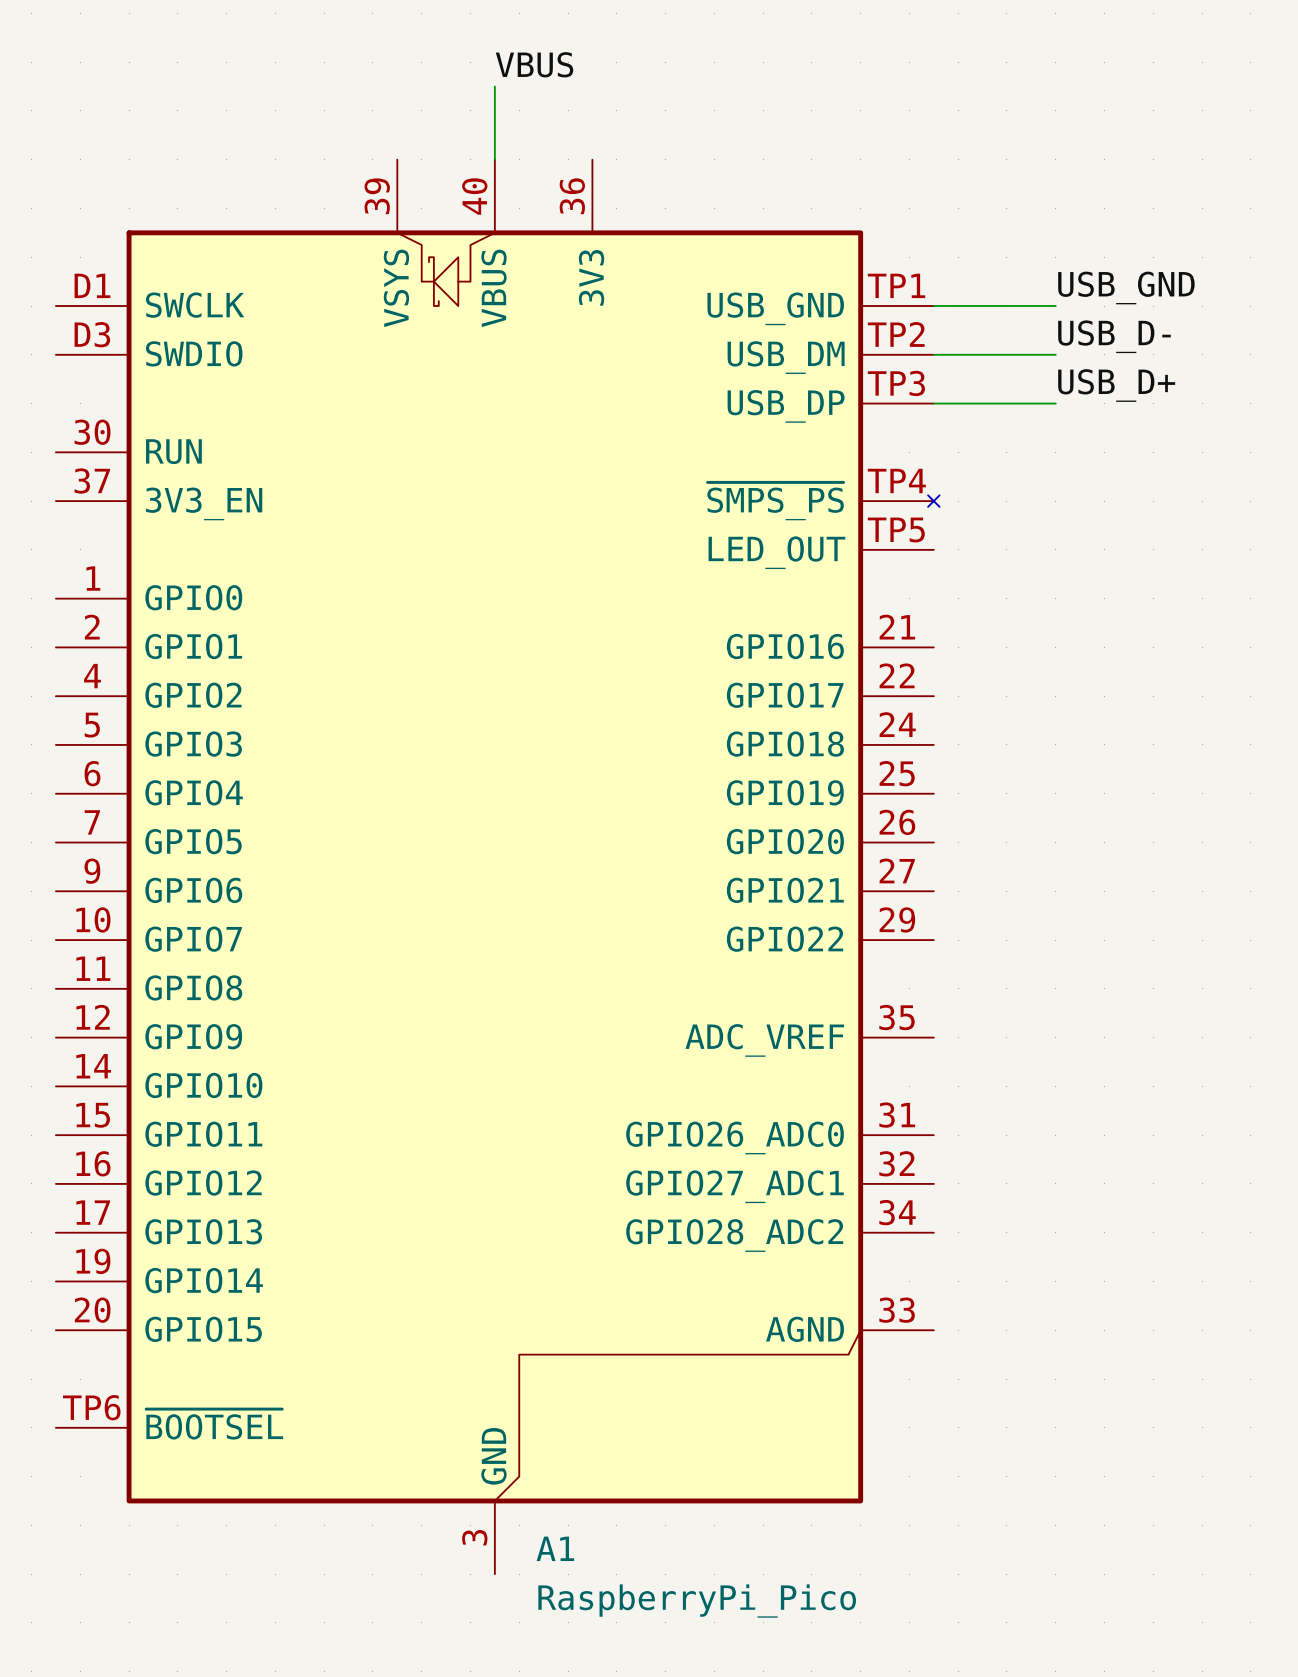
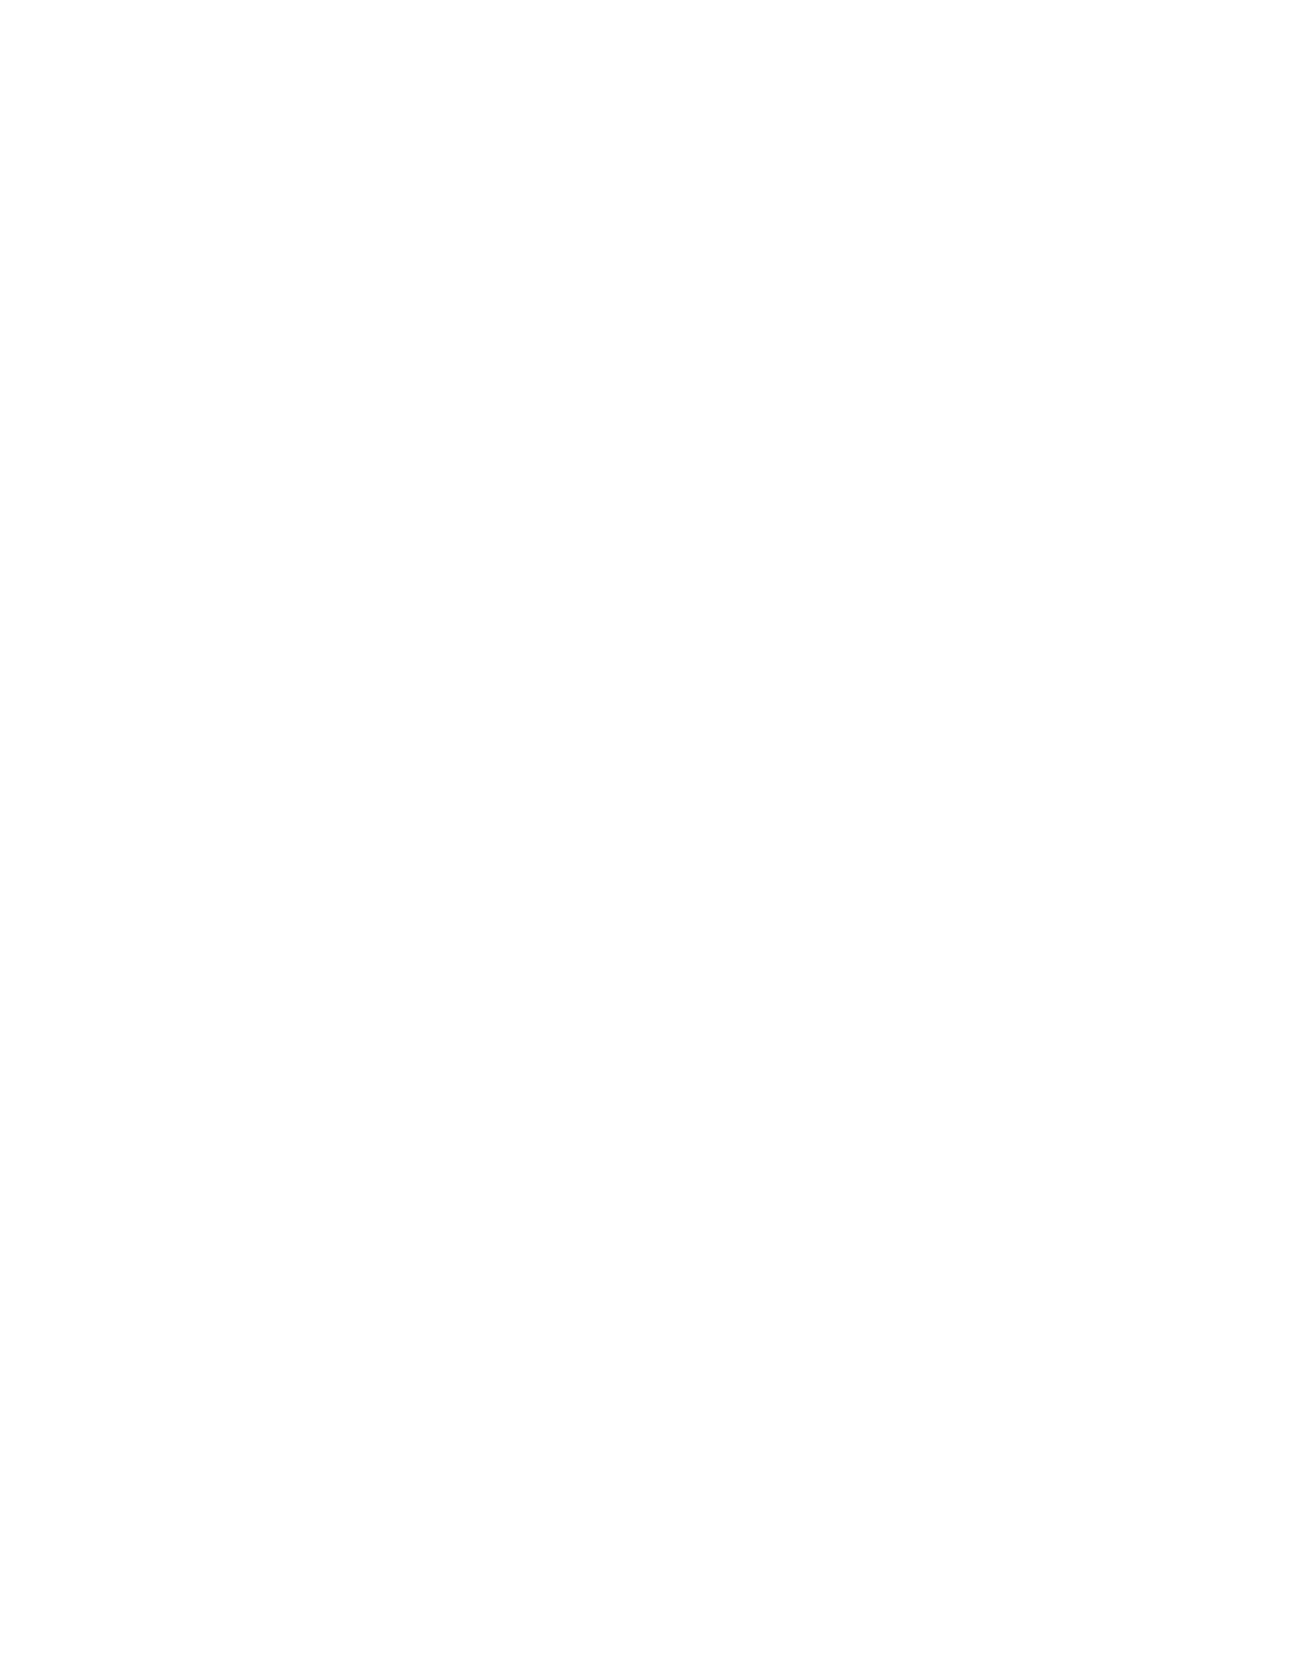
label: VBUS (534, 64) -> none
wire: (494, 86) (494, 159) -> none
label: USB_GND (1126, 287) -> none
wire: (933, 306) (1055, 306) -> none
label: USB_D- (1114, 336) -> none
wire: (933, 354) (1055, 354) -> none
label: USB_D+ (1116, 385) -> none
wire: (933, 403) (1055, 403) -> none
A1: RaspberryPi_Pico (497, 866) -> none

